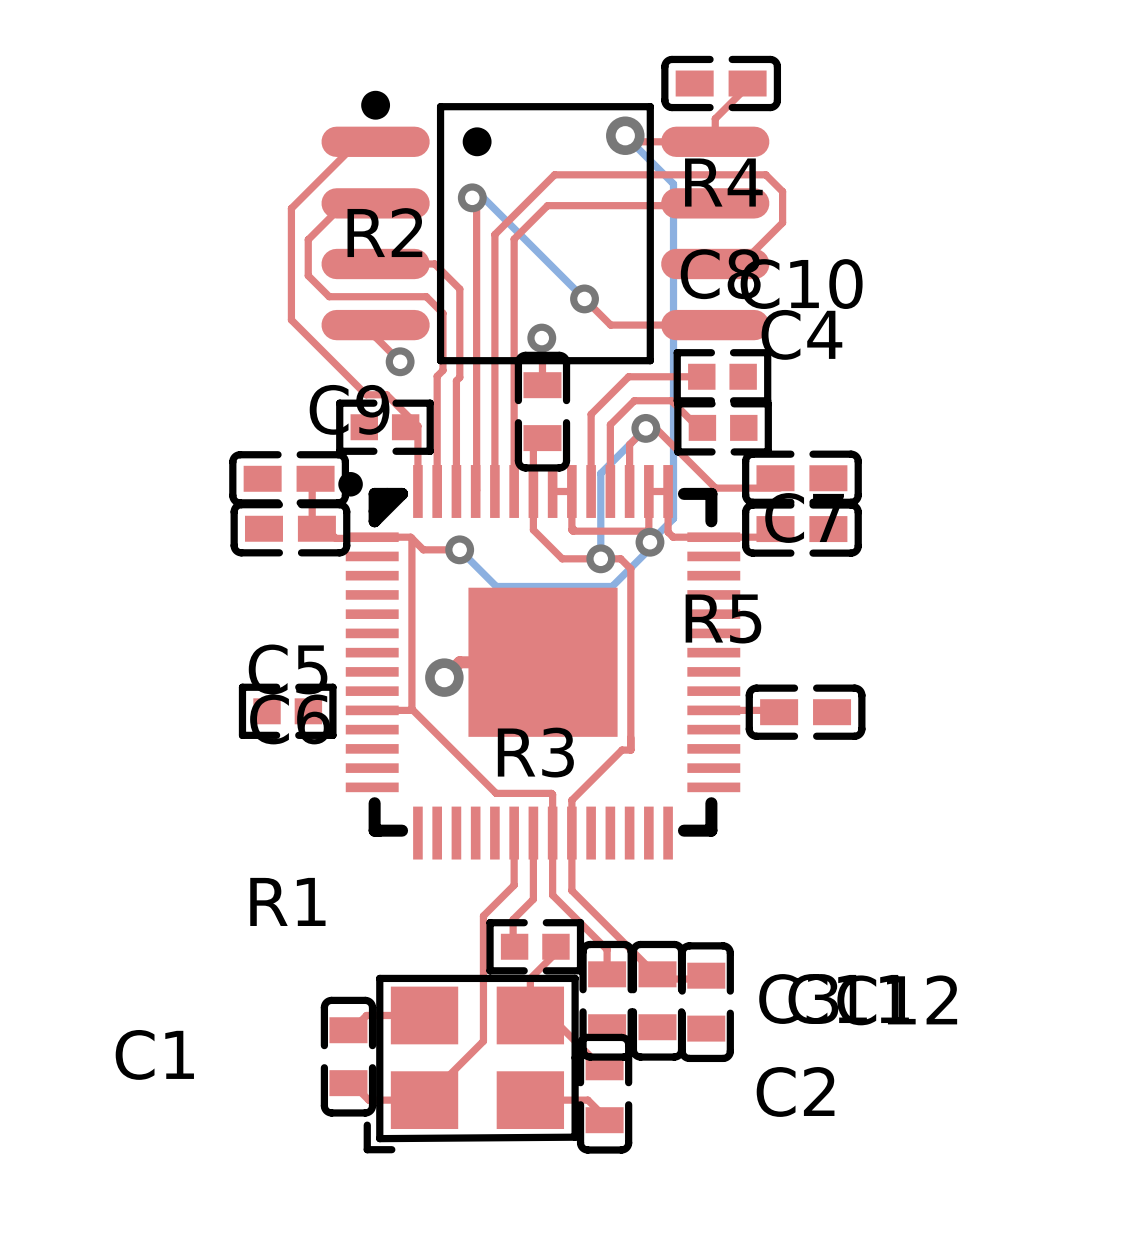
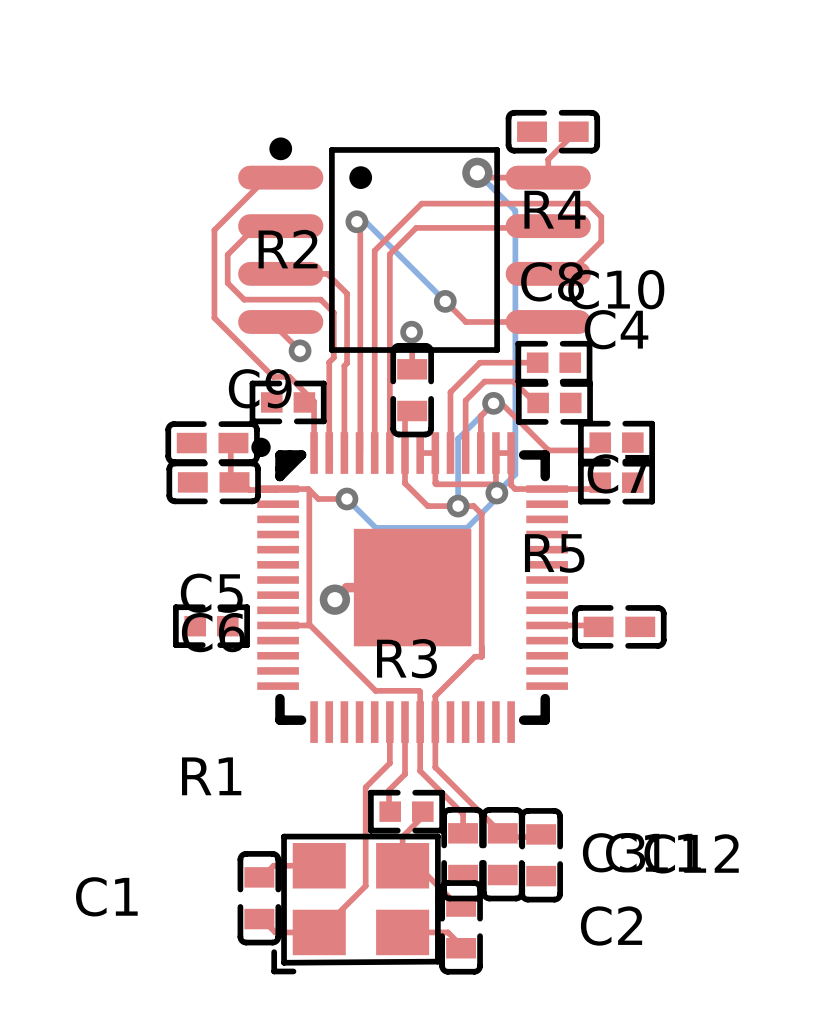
C10 footprint: [742, 450, 862, 506] -> [578, 420, 656, 465]
C4 footprint: [742, 501, 862, 557] -> [578, 460, 656, 505]

